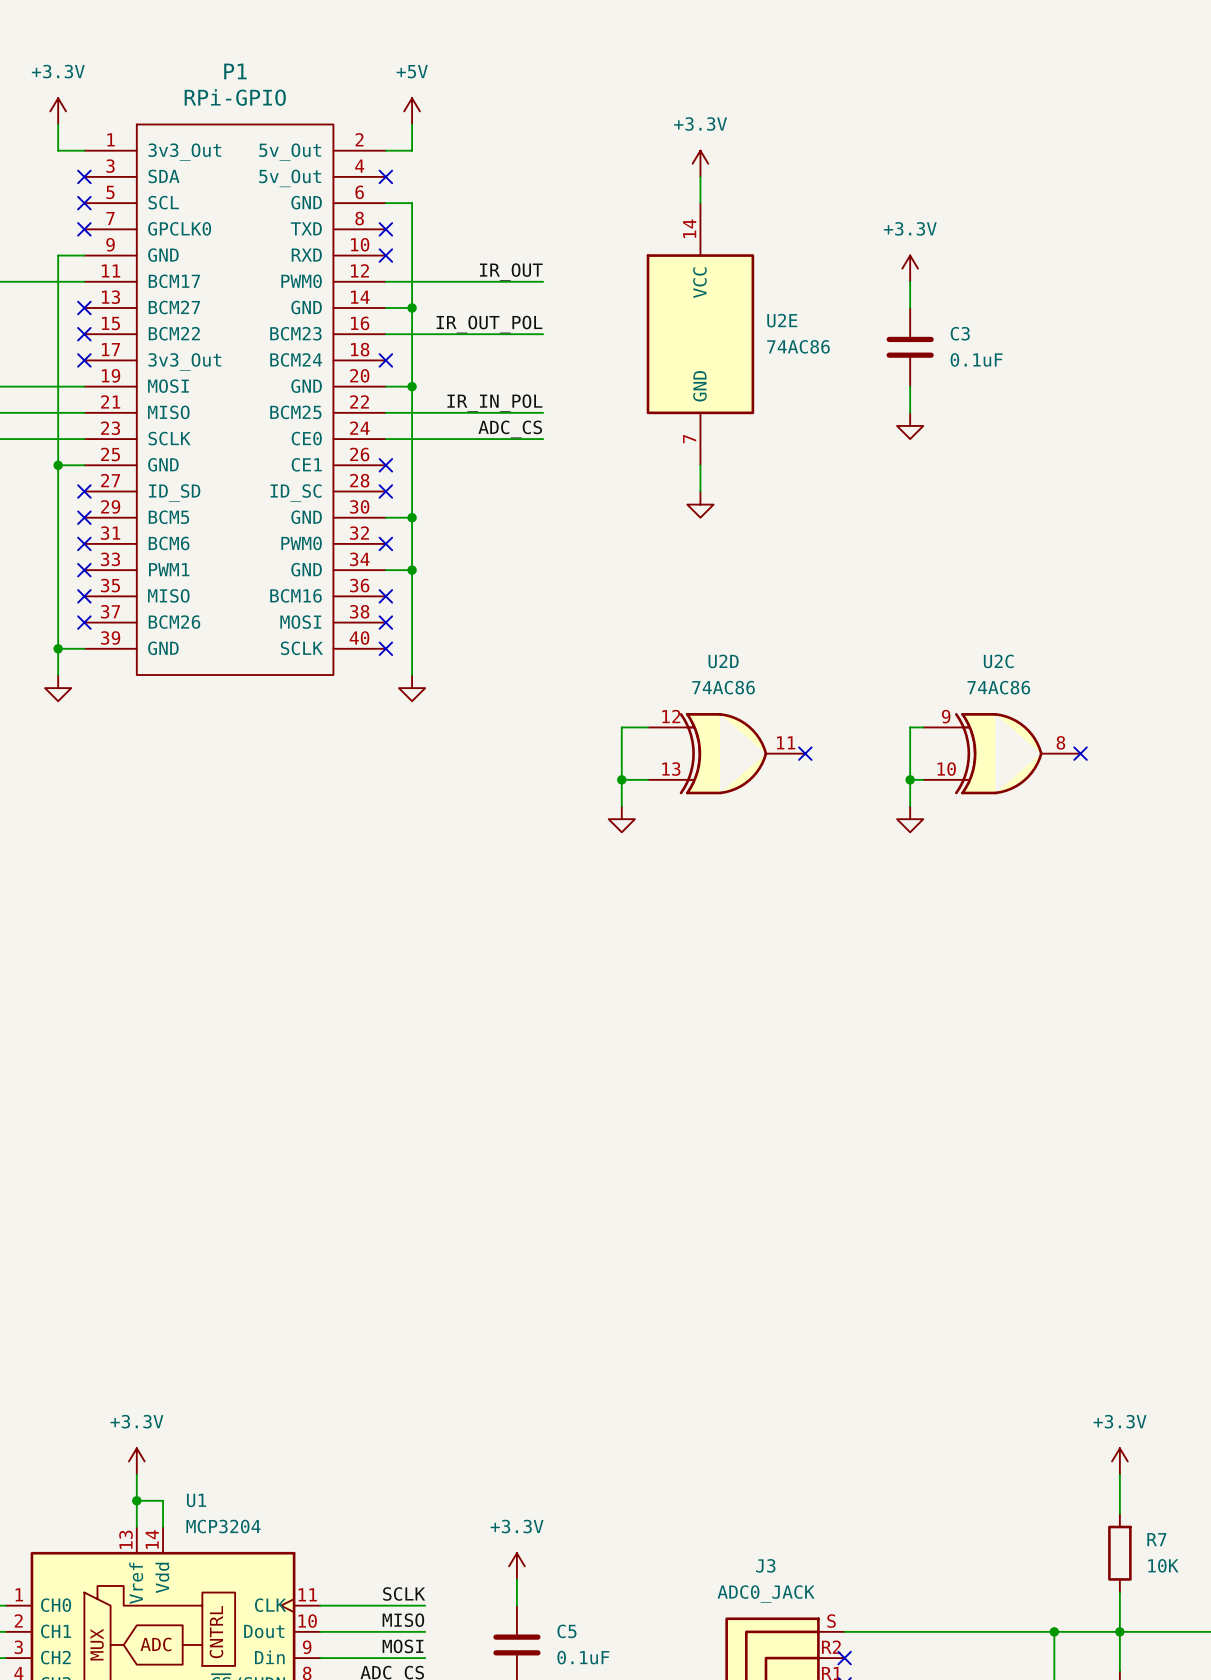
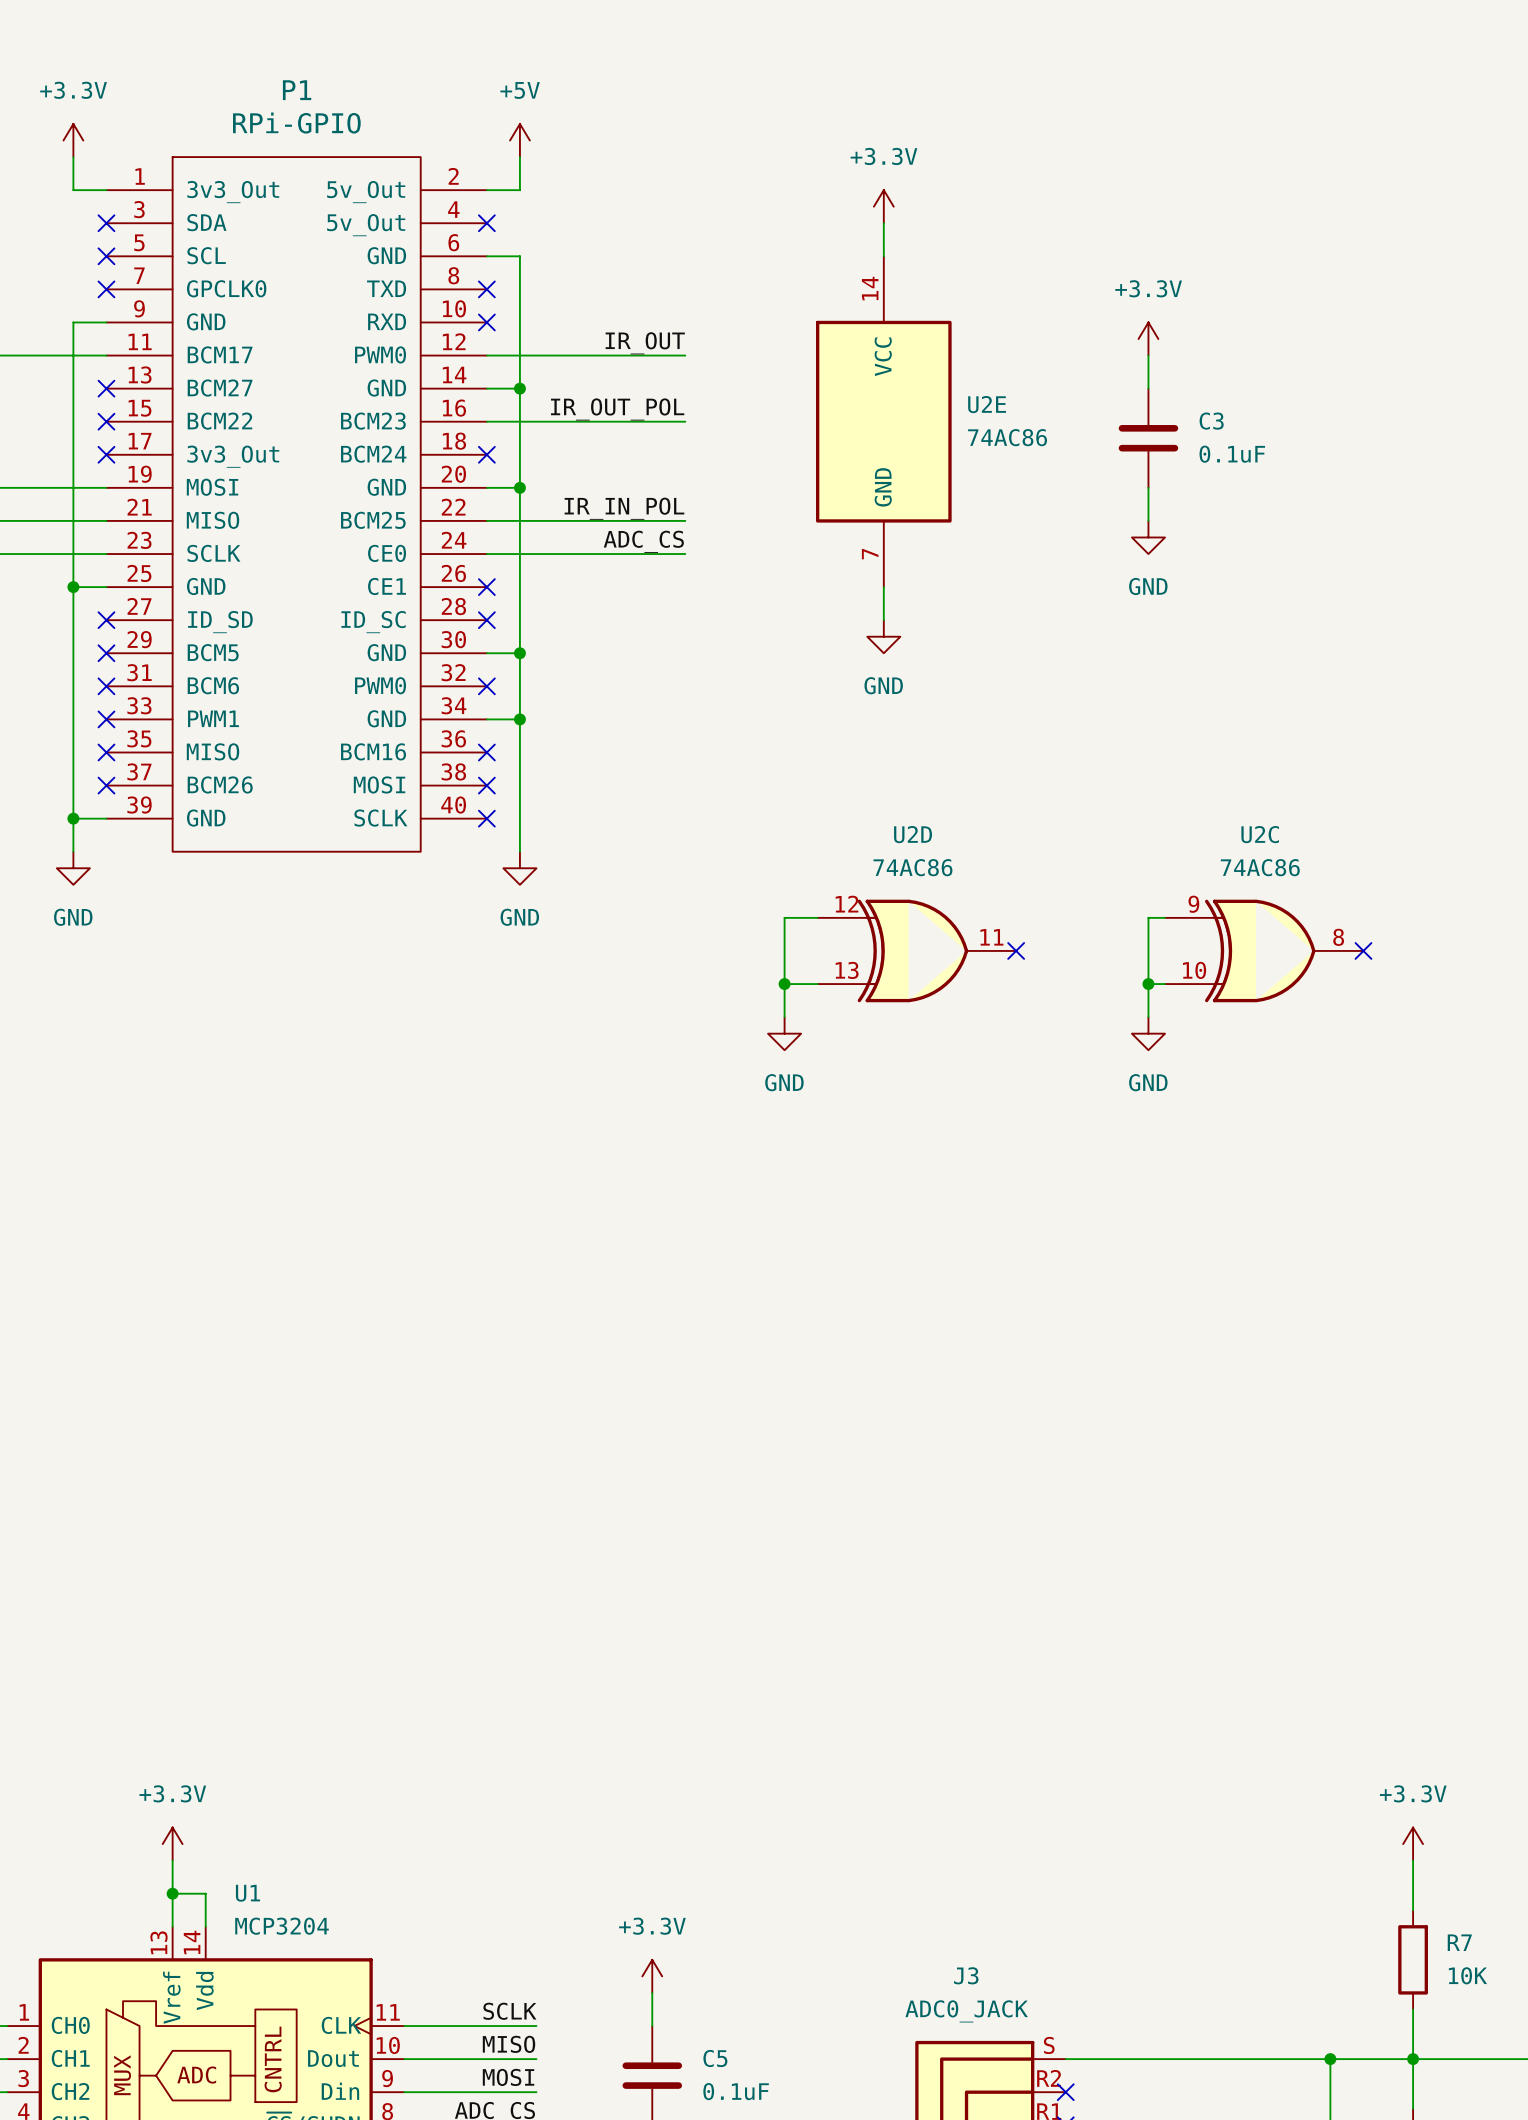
power symbol text: none -> GND (1148, 586)
power symbol text: none -> GND (883, 685)
power symbol text: none -> GND (73, 917)
power symbol text: none -> GND (519, 917)
power symbol text: none -> GND (784, 1082)
power symbol text: none -> GND (1148, 1082)

